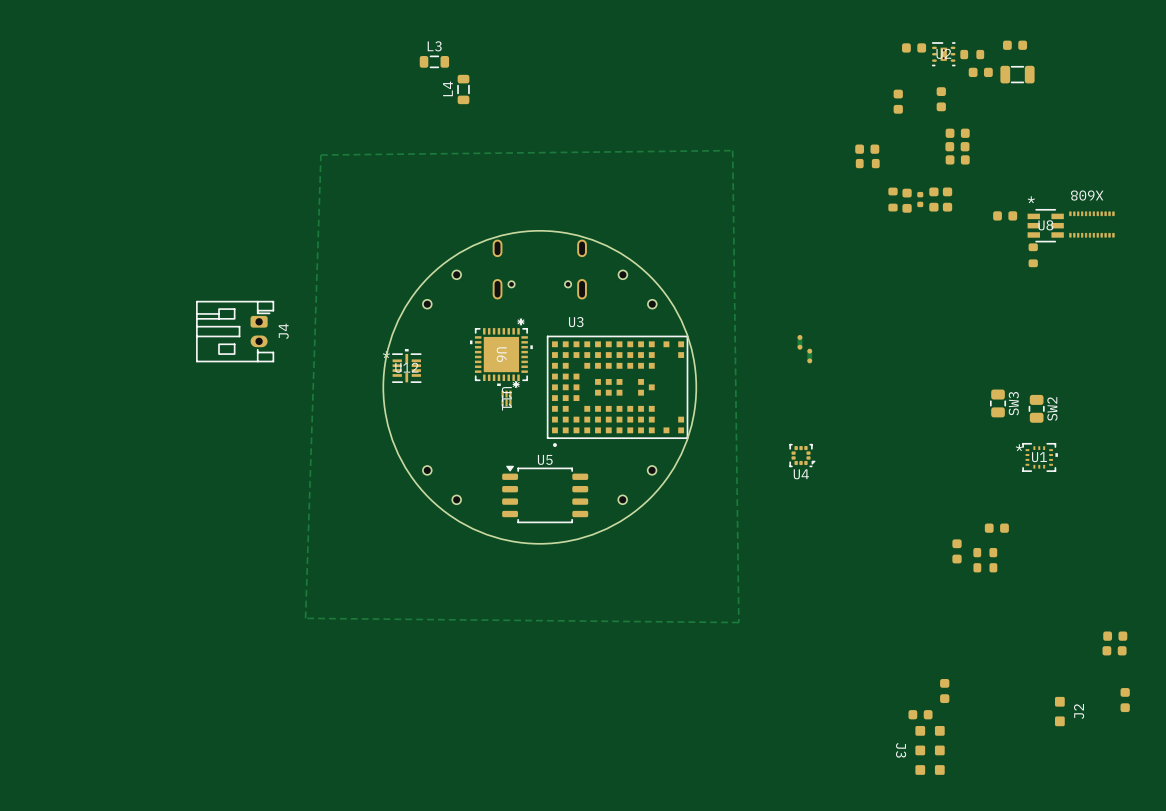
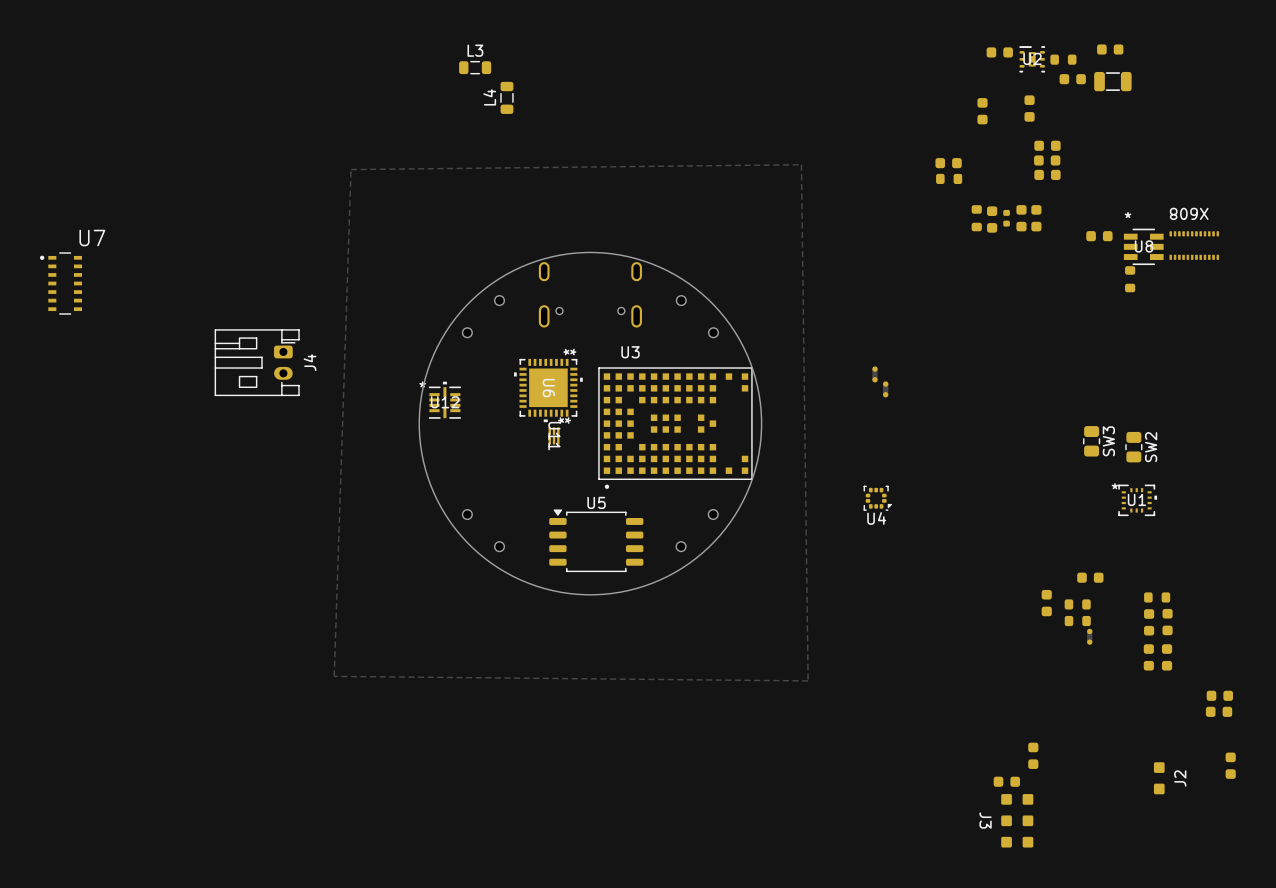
U7: none -> (61, 283)
part: none -> (1157, 597)
part: none -> (1149, 622)
part: none -> (1167, 622)
part: none -> (1089, 636)
part: none -> (1148, 657)
part: none -> (1167, 657)

